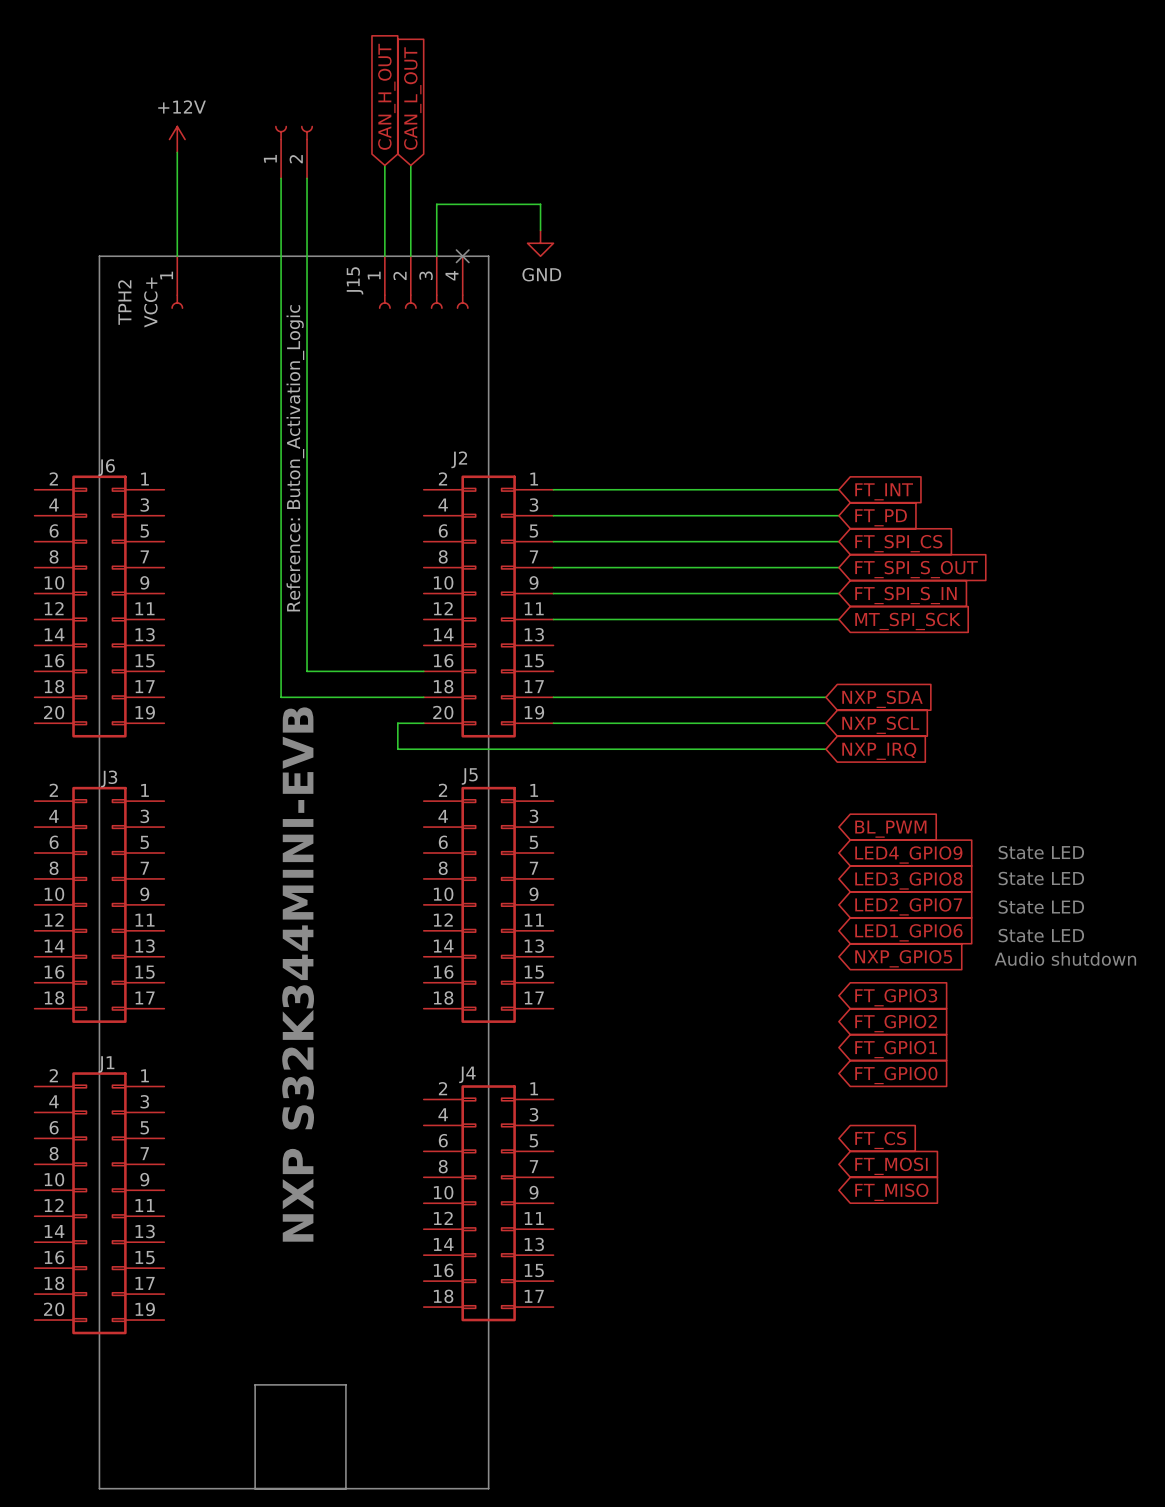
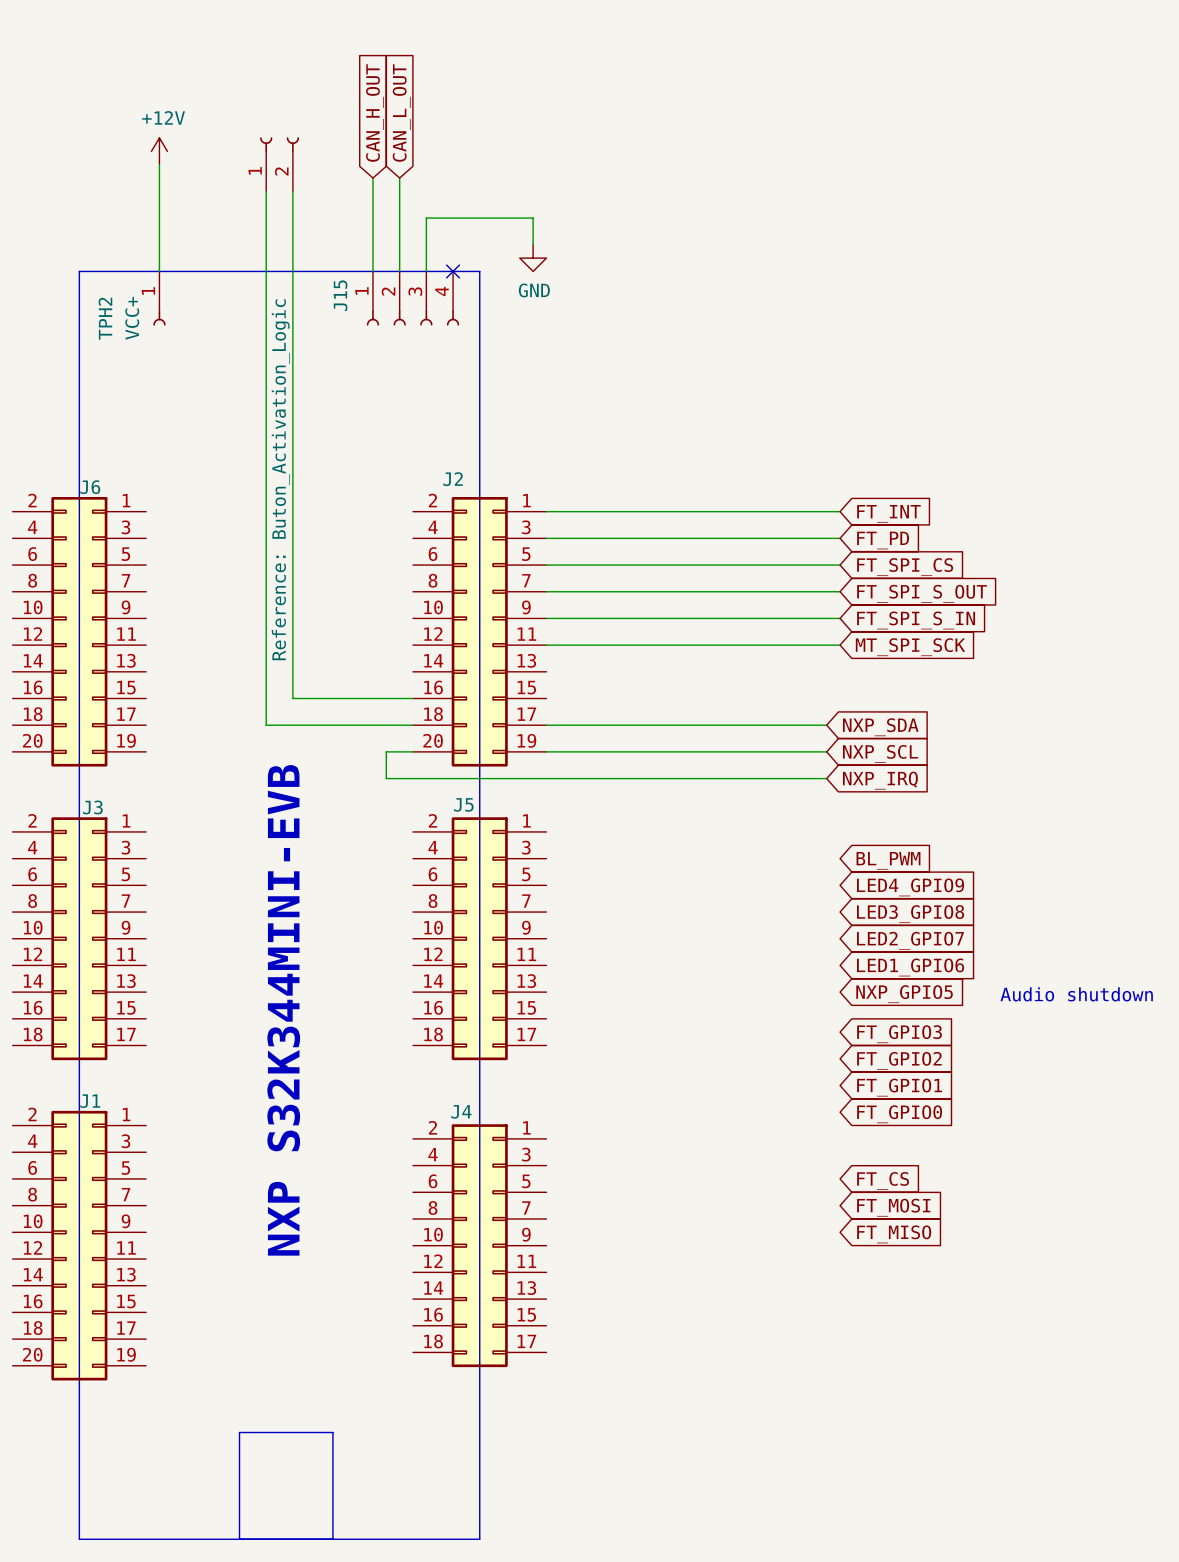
text: State LED (1041, 852) -> none
text: State LED (1041, 878) -> none
text: State LED (1041, 907) -> none
text: State LED (1041, 935) -> none

